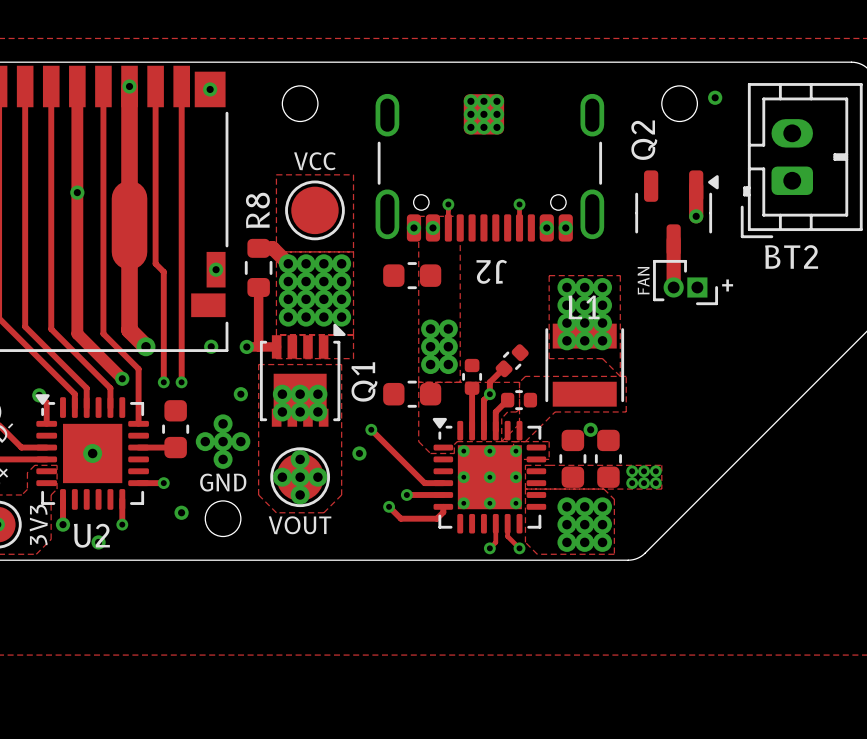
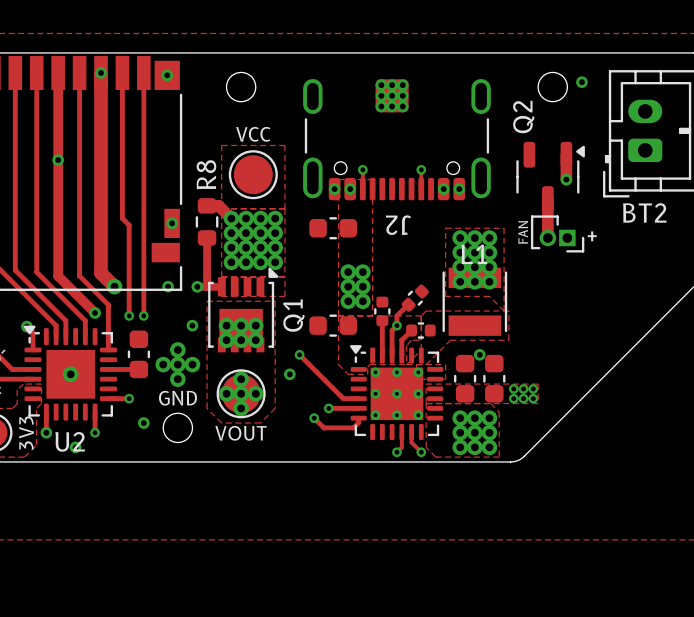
track width: thick (129, 198) (129, 251) -> thin (101, 164) (101, 208)

